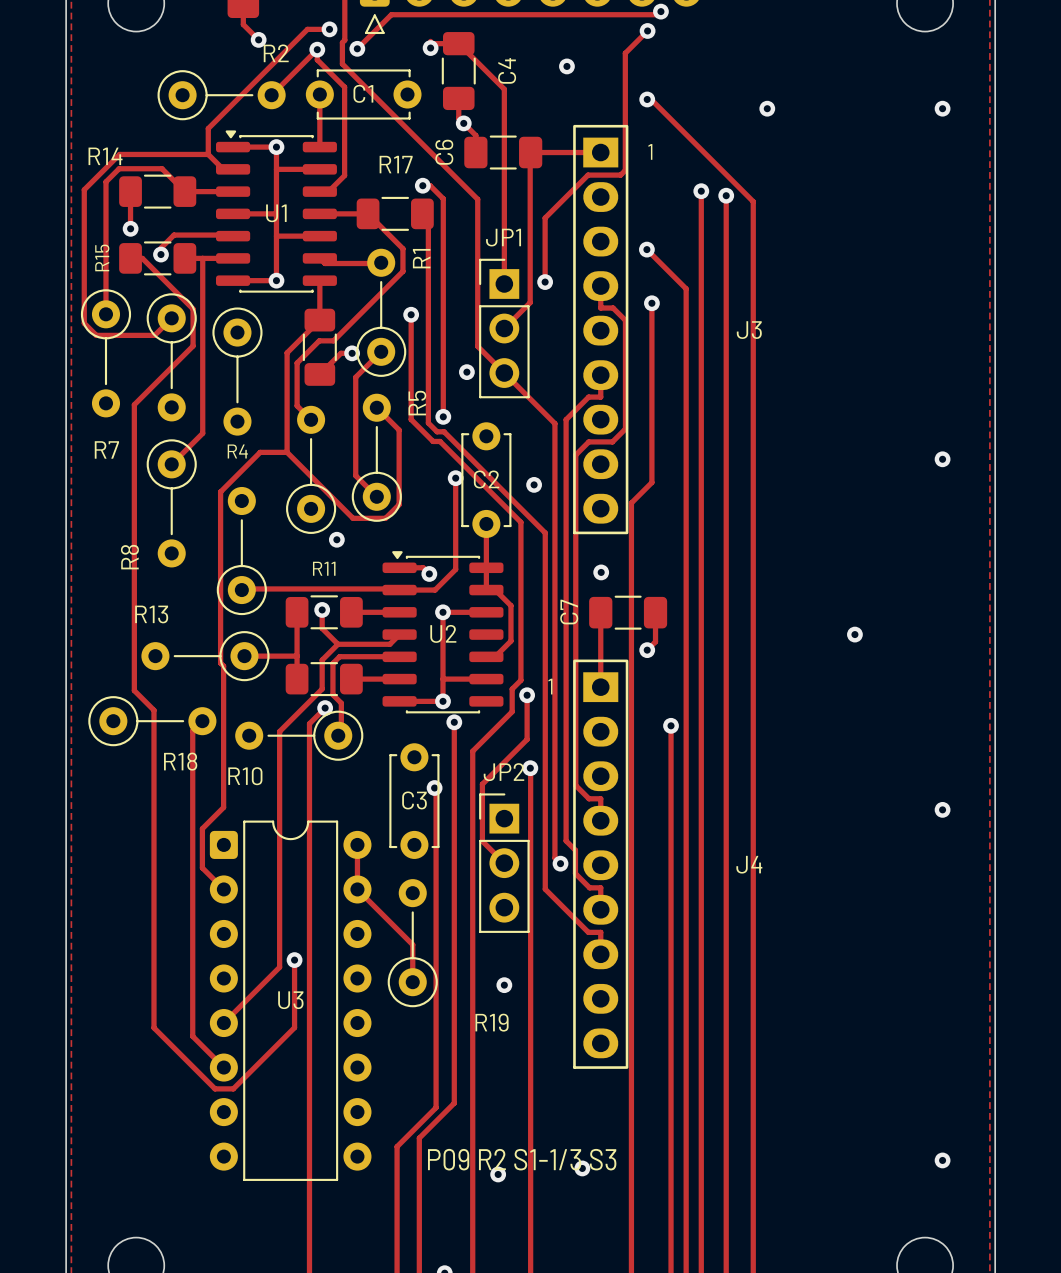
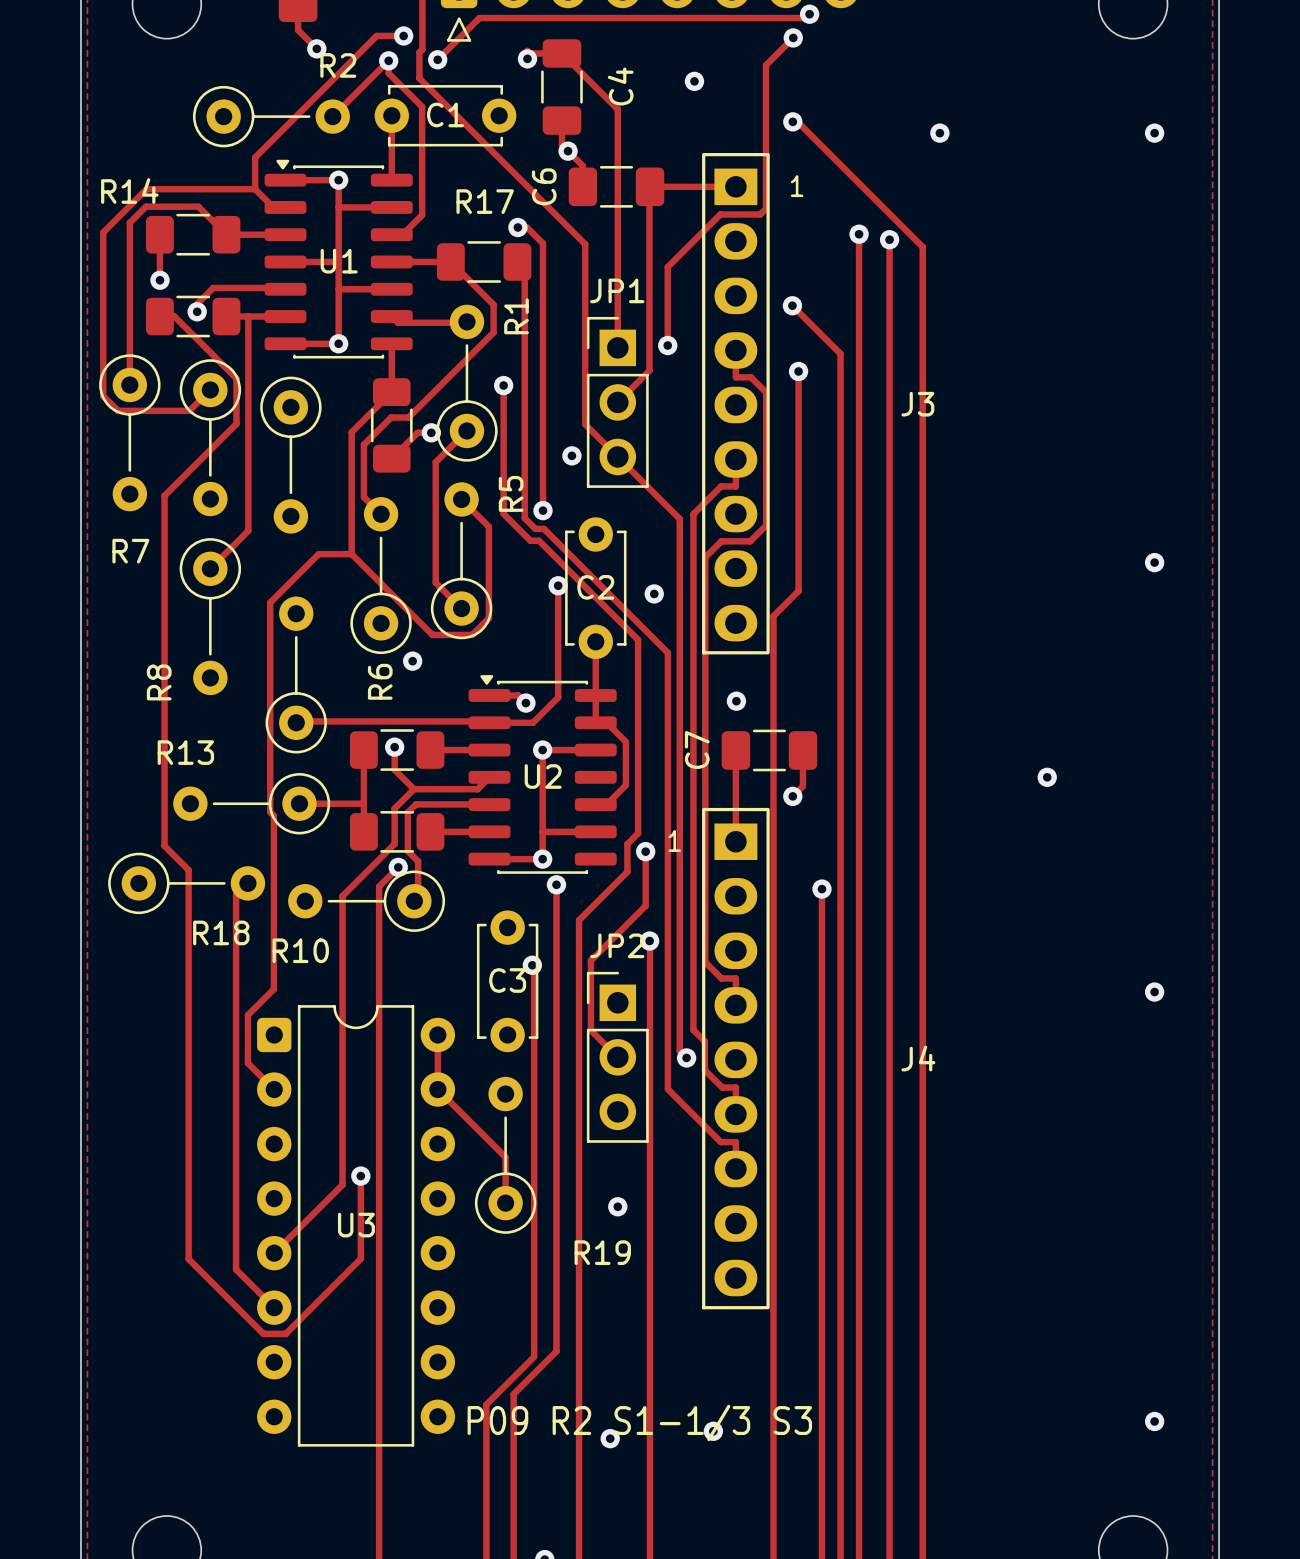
R15 name: R15 (102, 257) -> none
R4 name: R4 (237, 451) -> none
R6 name: none -> R6 (380, 681)
R11 name: R11 (324, 568) -> none

